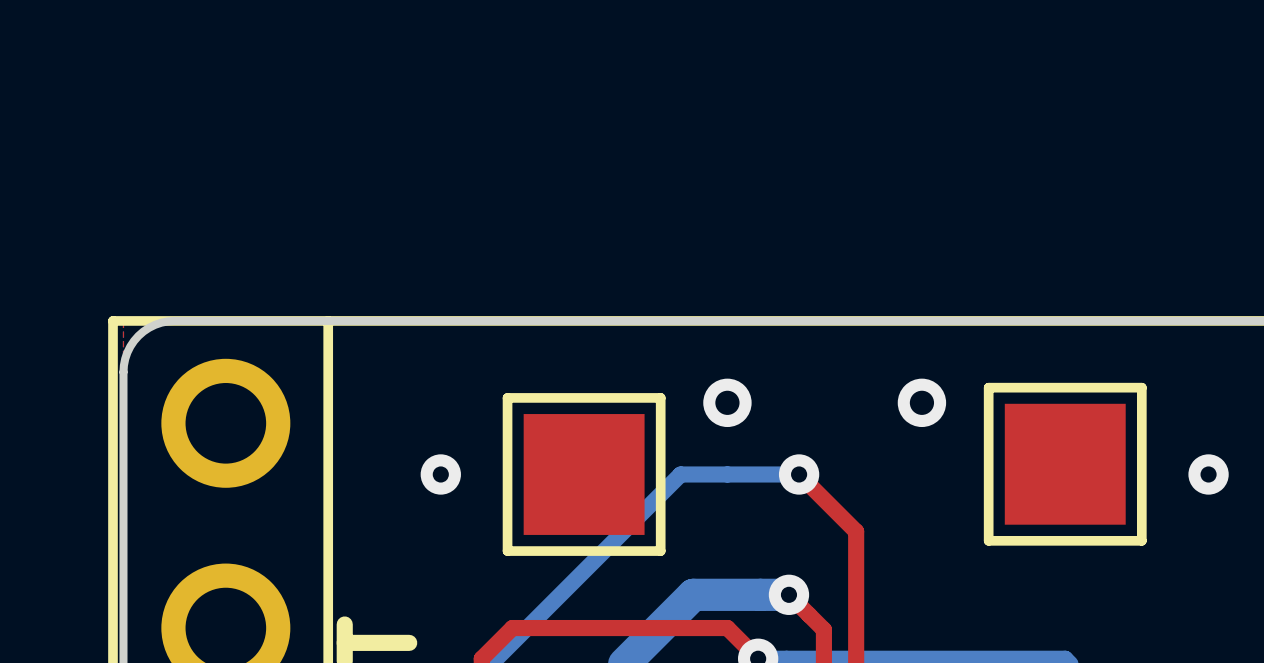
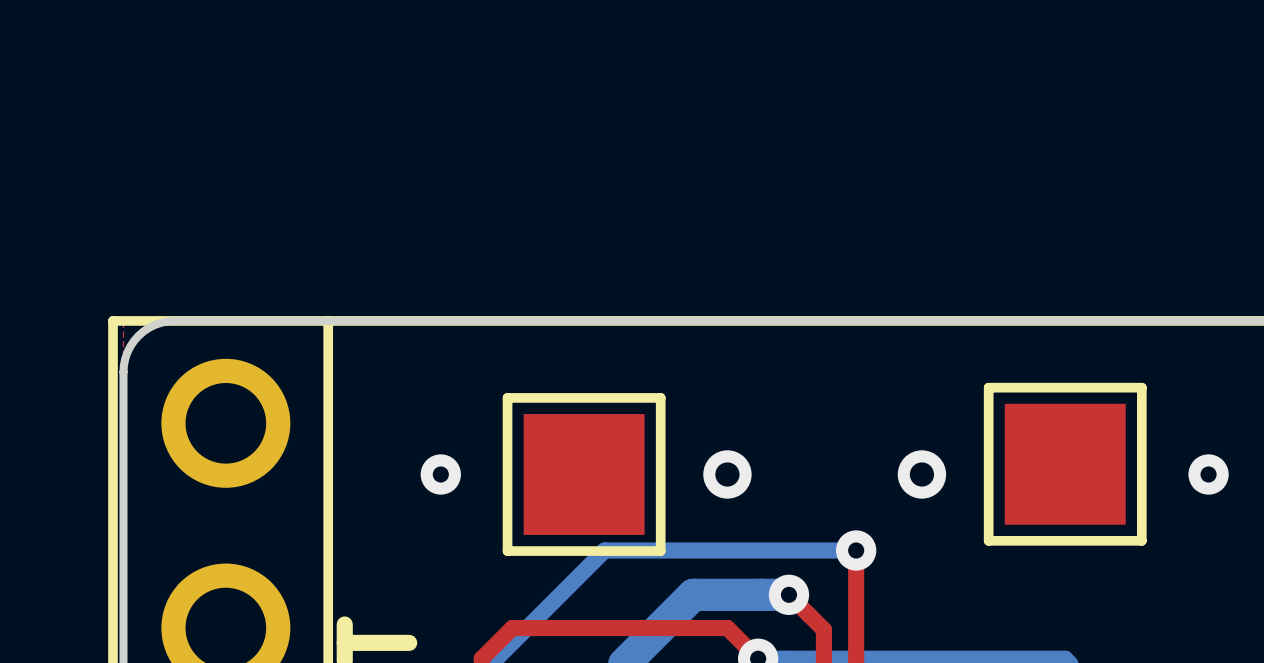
via position: (727, 402) -> (727, 474)
via position: (921, 402) -> (921, 474)
bottom track: (799, 474) (680, 474) (604, 550) -> (856, 550) (604, 550)
top track: (799, 474) (856, 531) (856, 550) -> none
via position: (799, 474) -> (856, 550)

